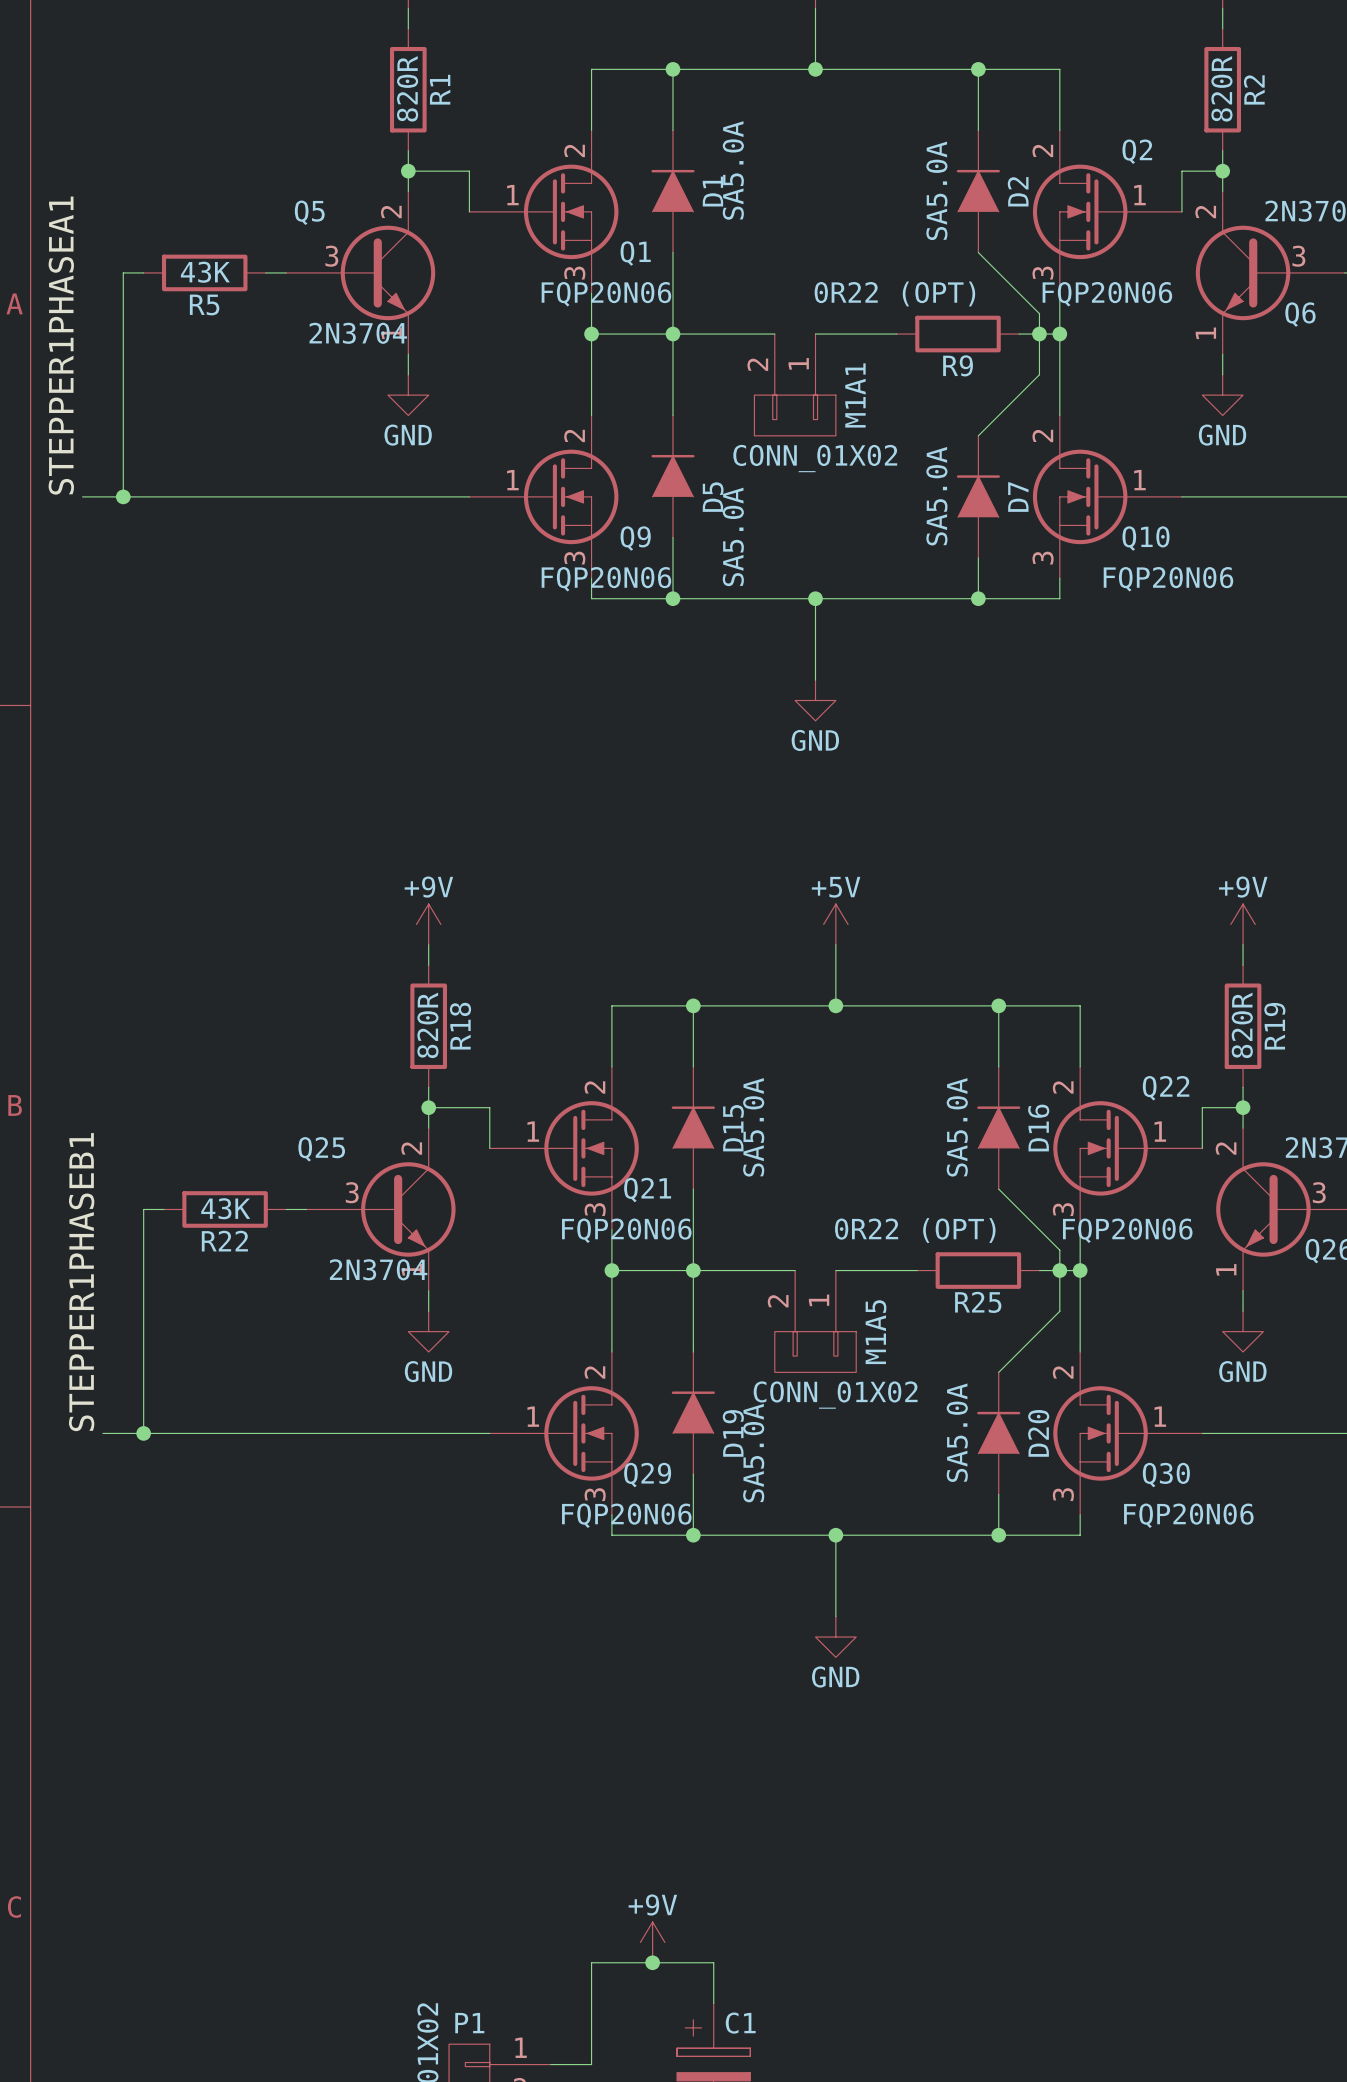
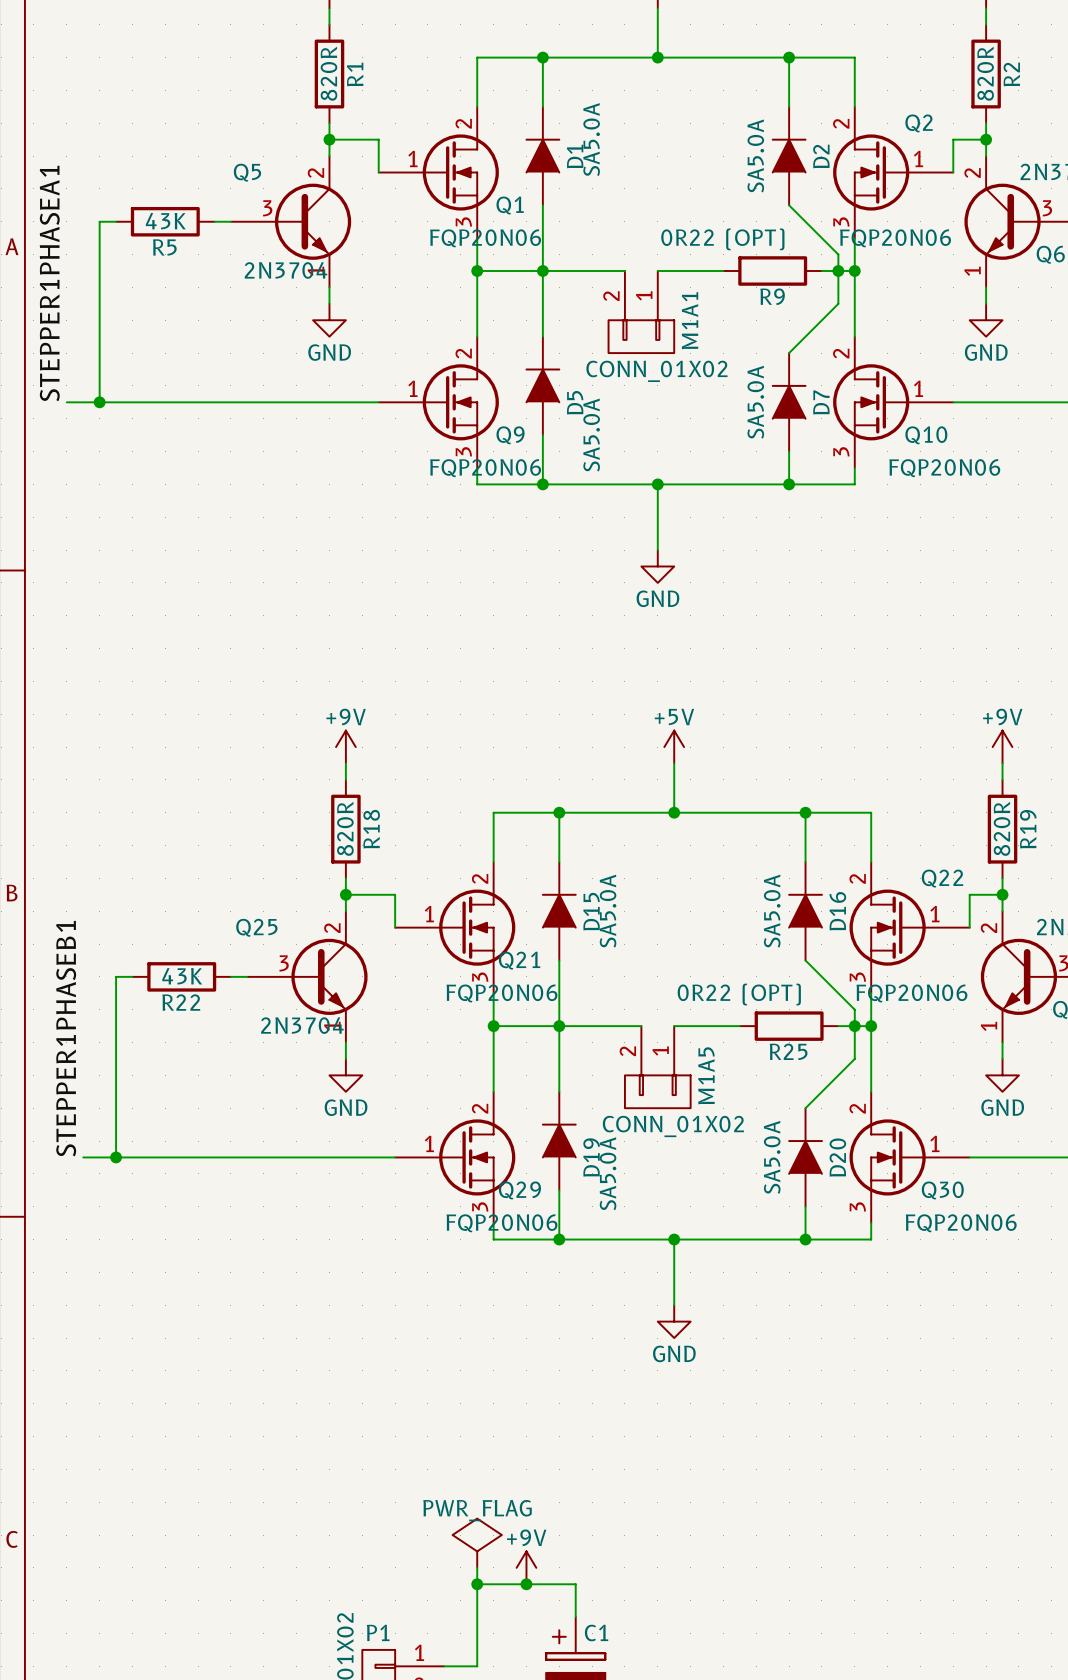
power symbol: none -> PWR_FLAG (477, 1543)
wire: none -> (477, 1567) (477, 1584)
junction: none -> (477, 1584)

